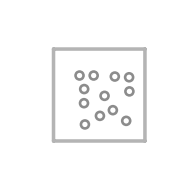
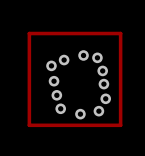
via: none -> (83, 55)
via: none -> (97, 57)
via: (79, 75) -> none
via: none -> (64, 60)
via: (93, 75) -> none
via: (114, 76) -> none
via: (129, 77) -> none
via: none -> (51, 65)
via: none -> (102, 70)
via: (84, 89) -> none
via: (129, 91) -> none
via: (104, 95) -> none
via: none -> (54, 81)
via: none -> (103, 84)
via: (84, 103) -> none
via: none -> (56, 95)
via: (112, 110) -> none
via: none -> (105, 98)
via: (99, 115) -> none
via: (126, 120) -> none
via: none -> (98, 111)
via: none -> (80, 114)

